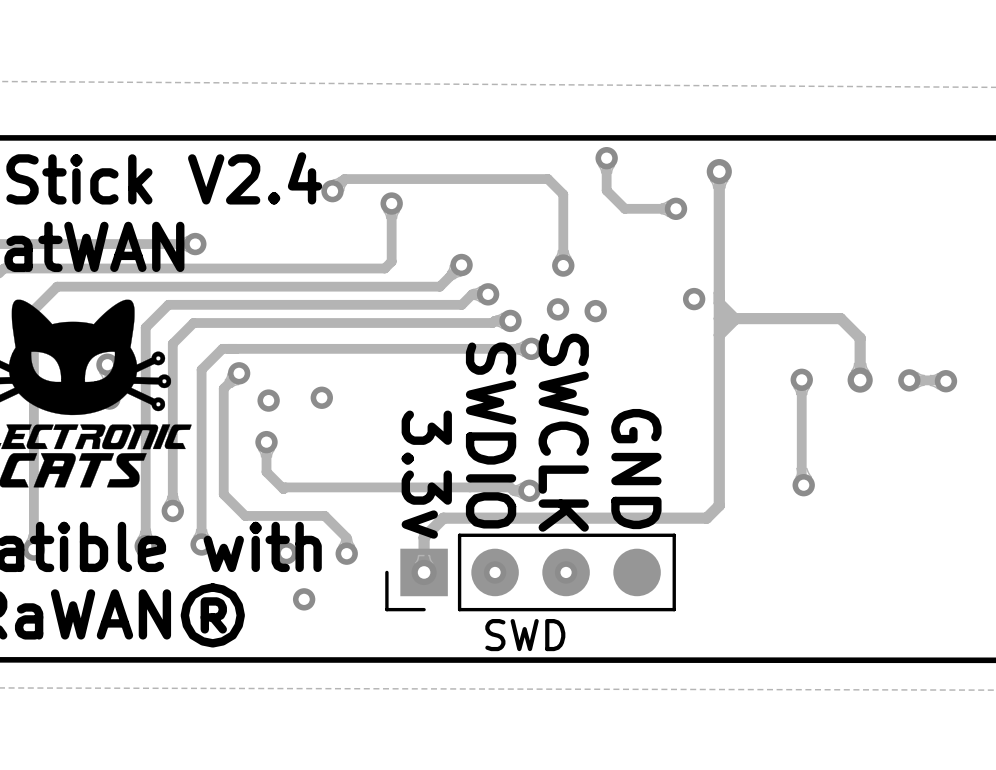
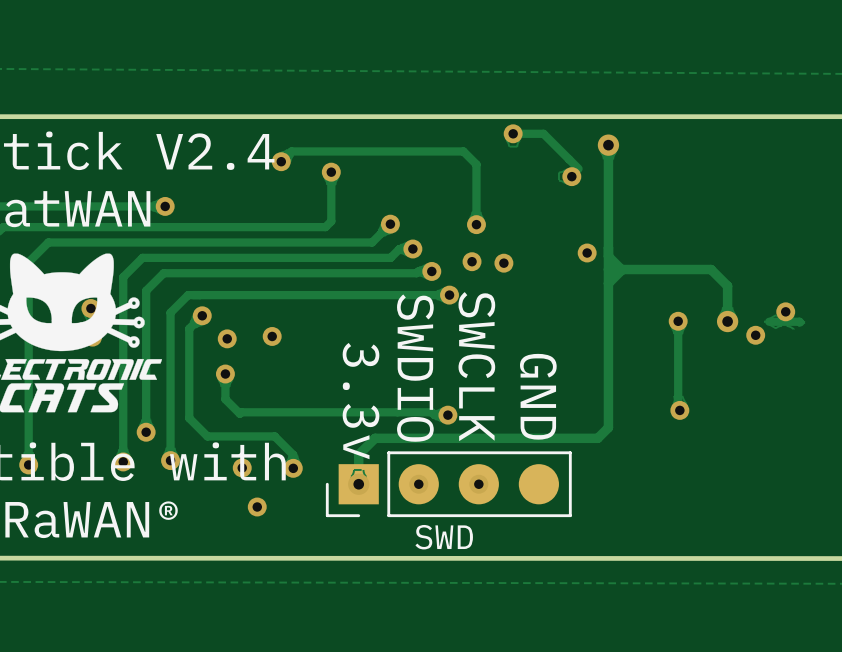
track: (606, 158) (606, 190) (624, 208) (675, 208) -> (513, 133) (543, 133) (578, 168)
via: none -> (785, 311)
via: (909, 380) -> none
via: (945, 381) -> none
via: none -> (755, 335)

